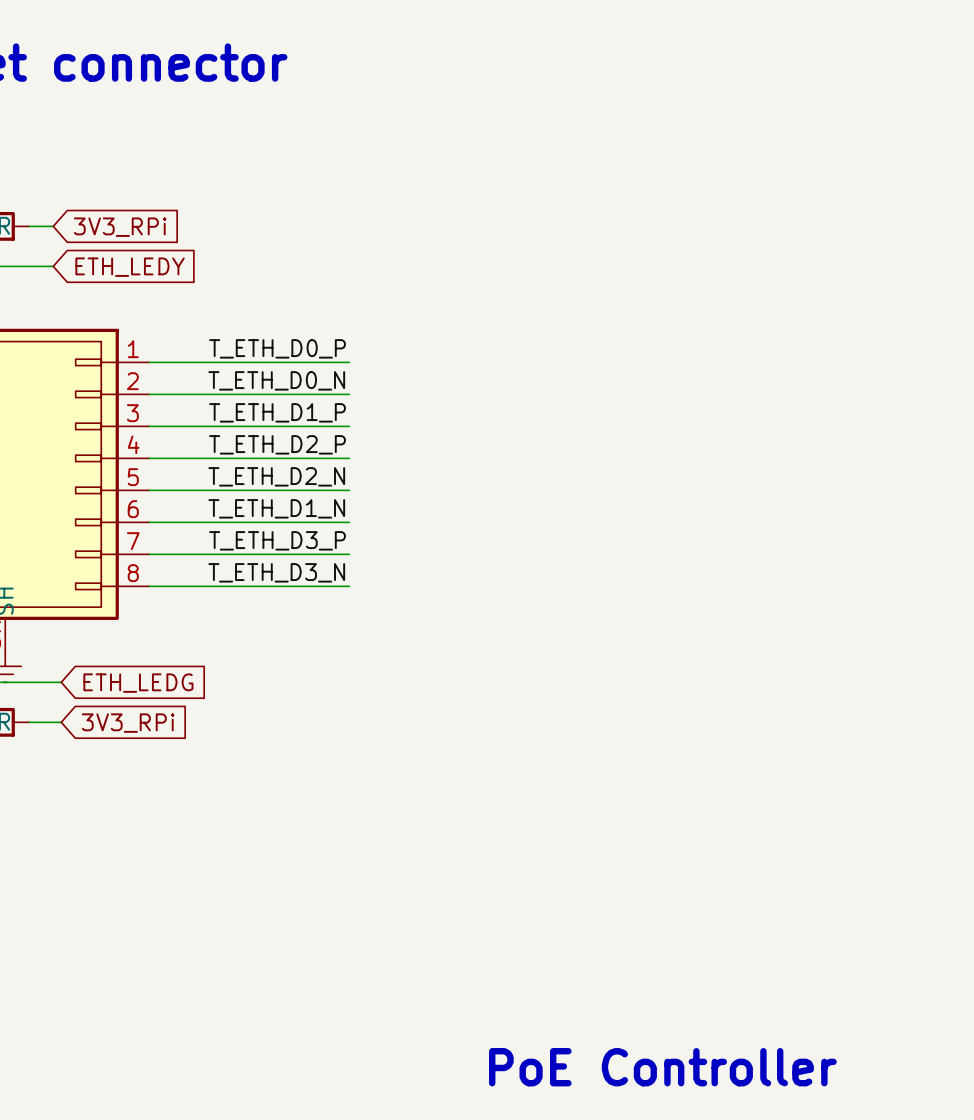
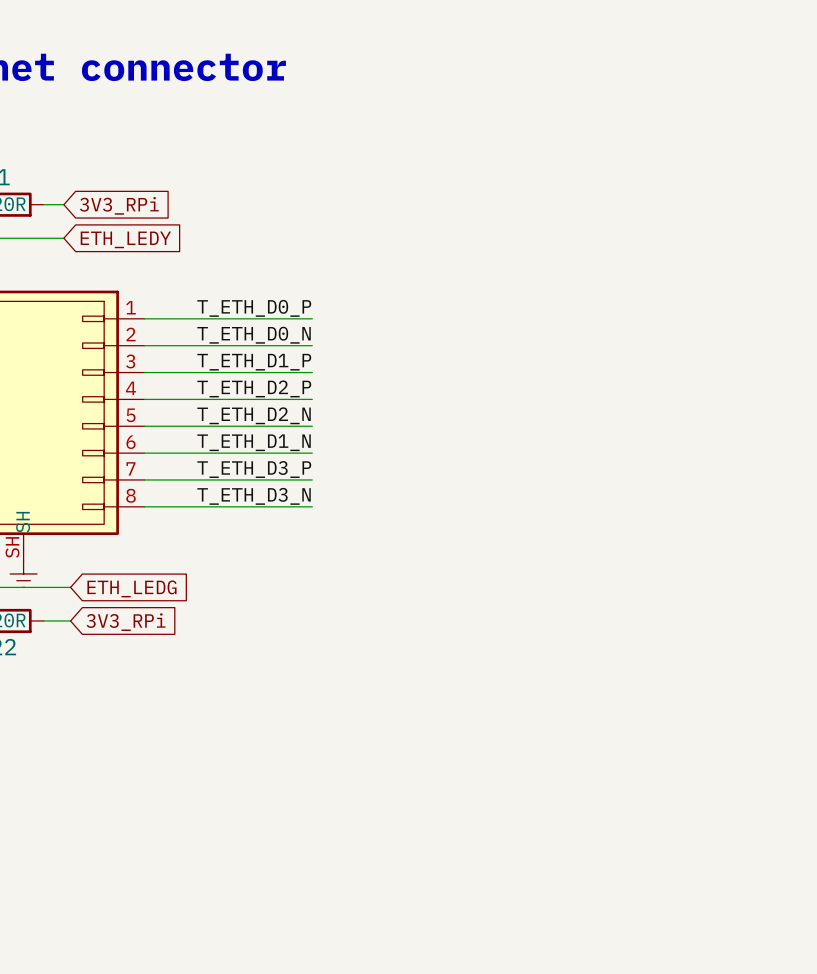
text: PoE Controller (662, 1067) -> none

